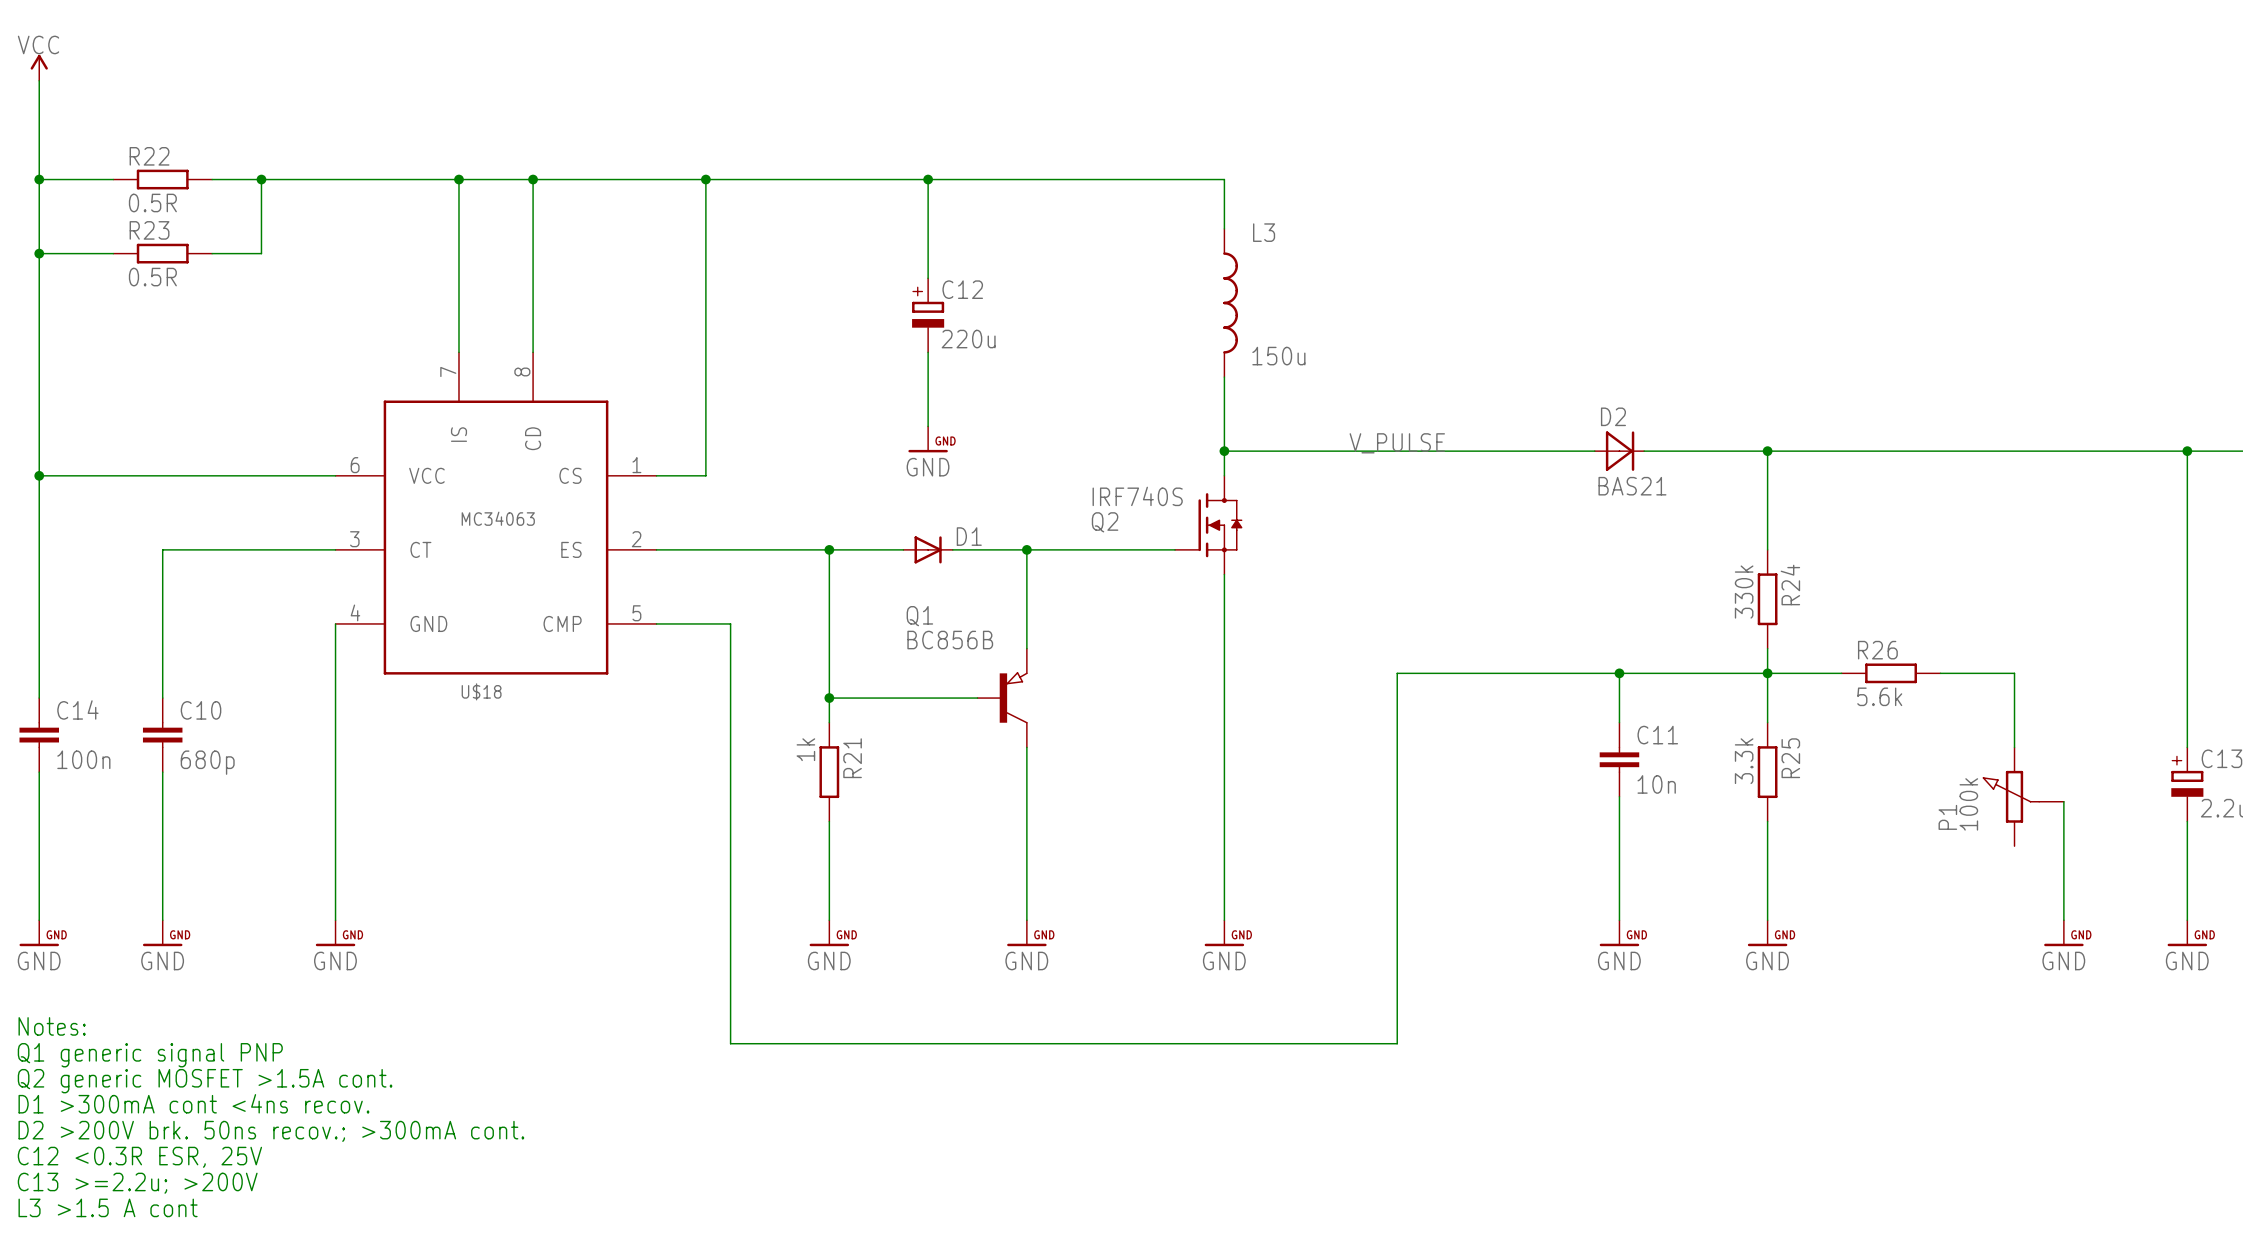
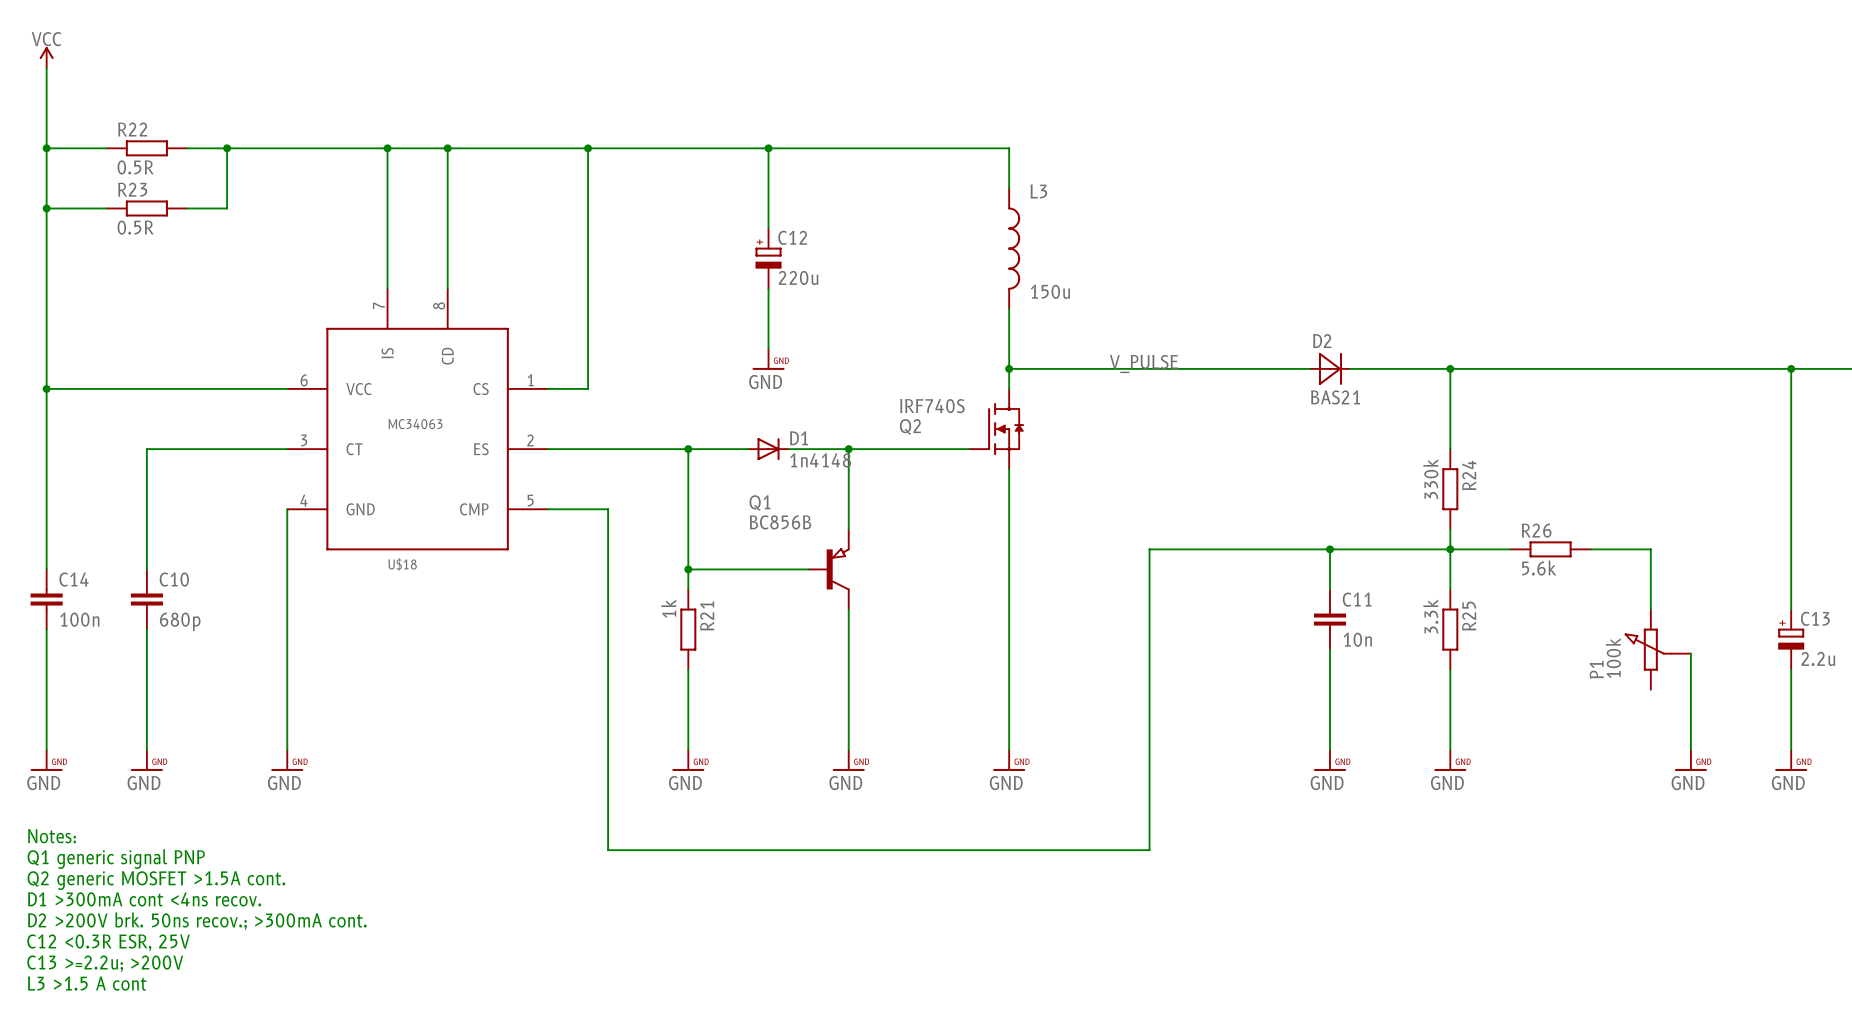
D1 value: none -> 1n4148 (820, 460)

